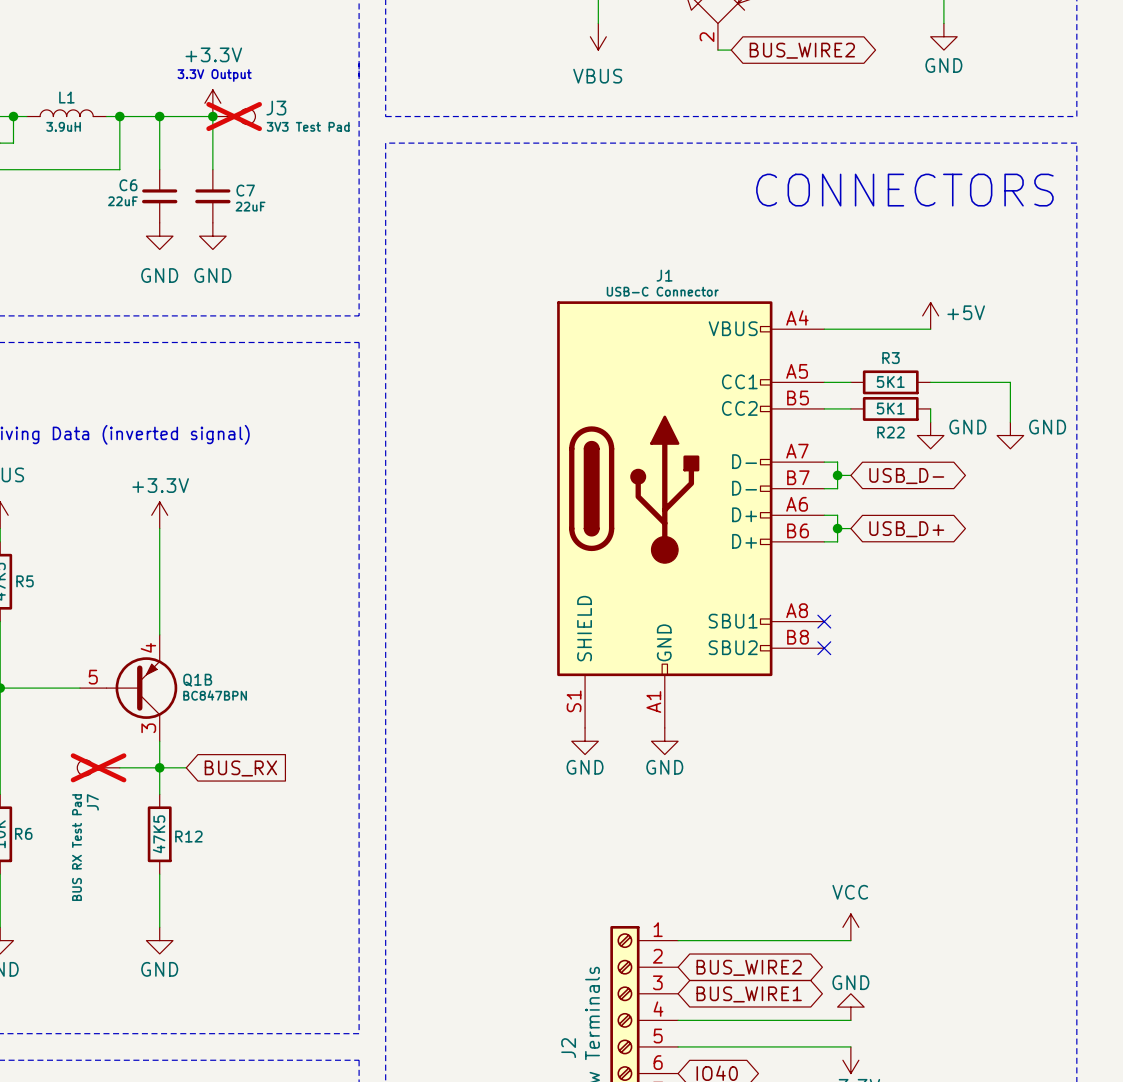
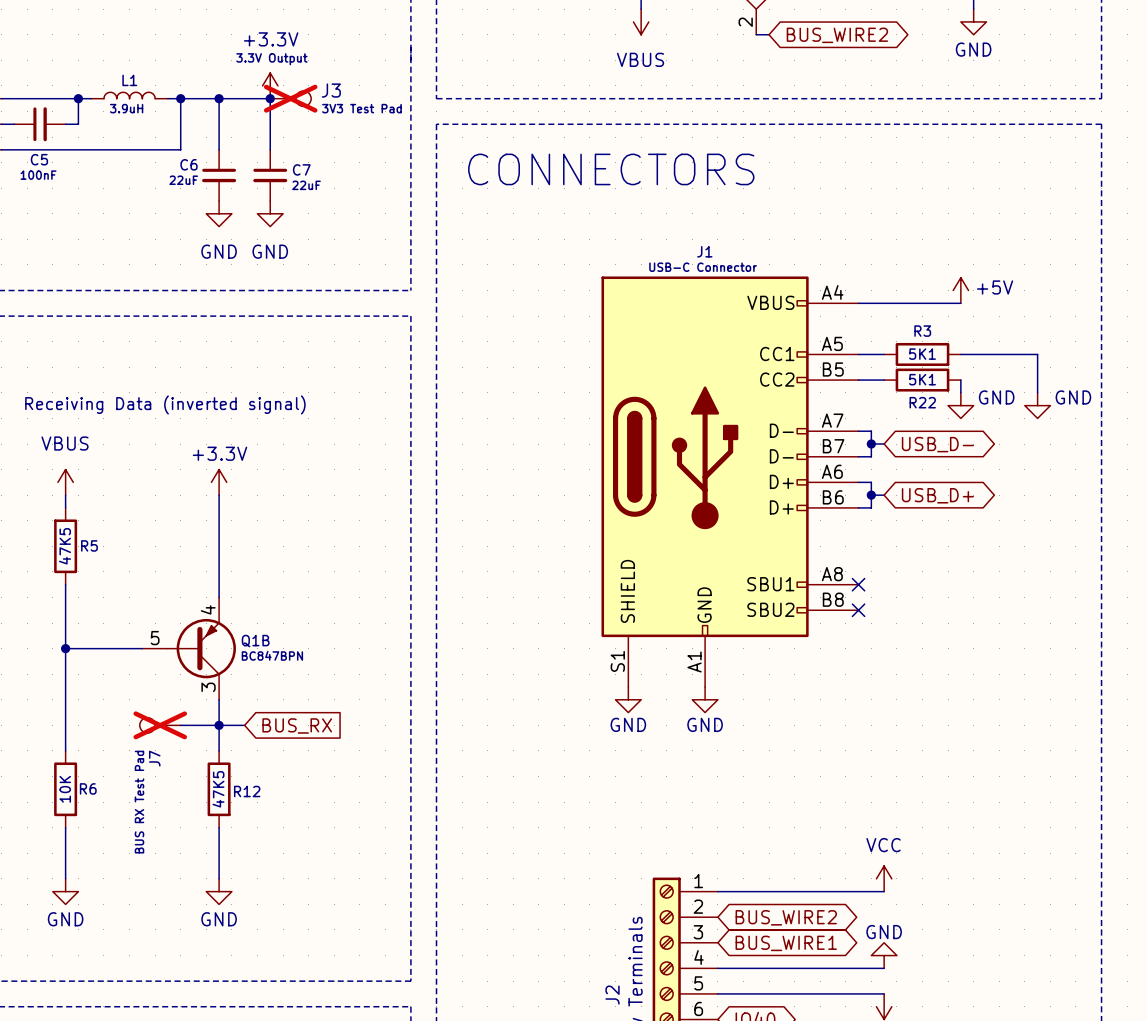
text: none -> CONNECTORS (611, 169)
text: CONNECTORS (904, 190) -> none

